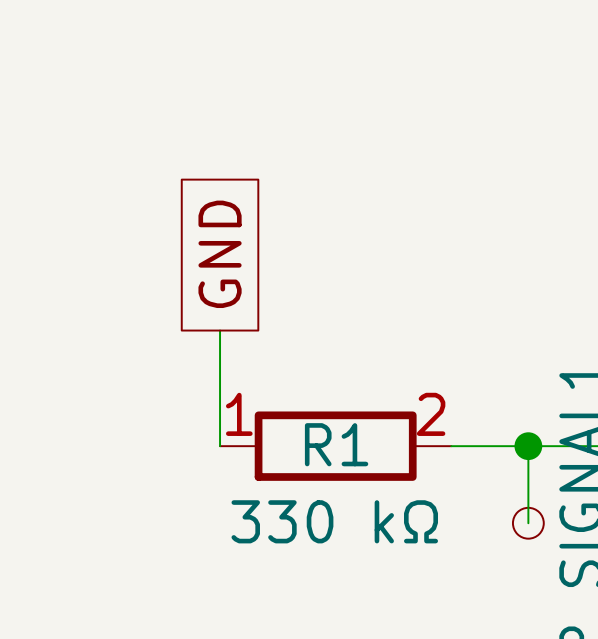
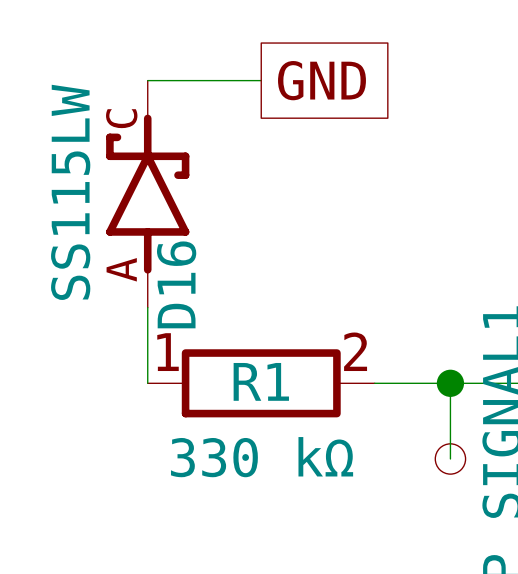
wire: none -> (147, 80) (261, 80)
D16: none -> SS115LW (147, 194)
global label rotation: 0° (220, 254) -> 90° clockwise (321, 80)
global label position: GND (220, 254) -> GND (321, 80)

